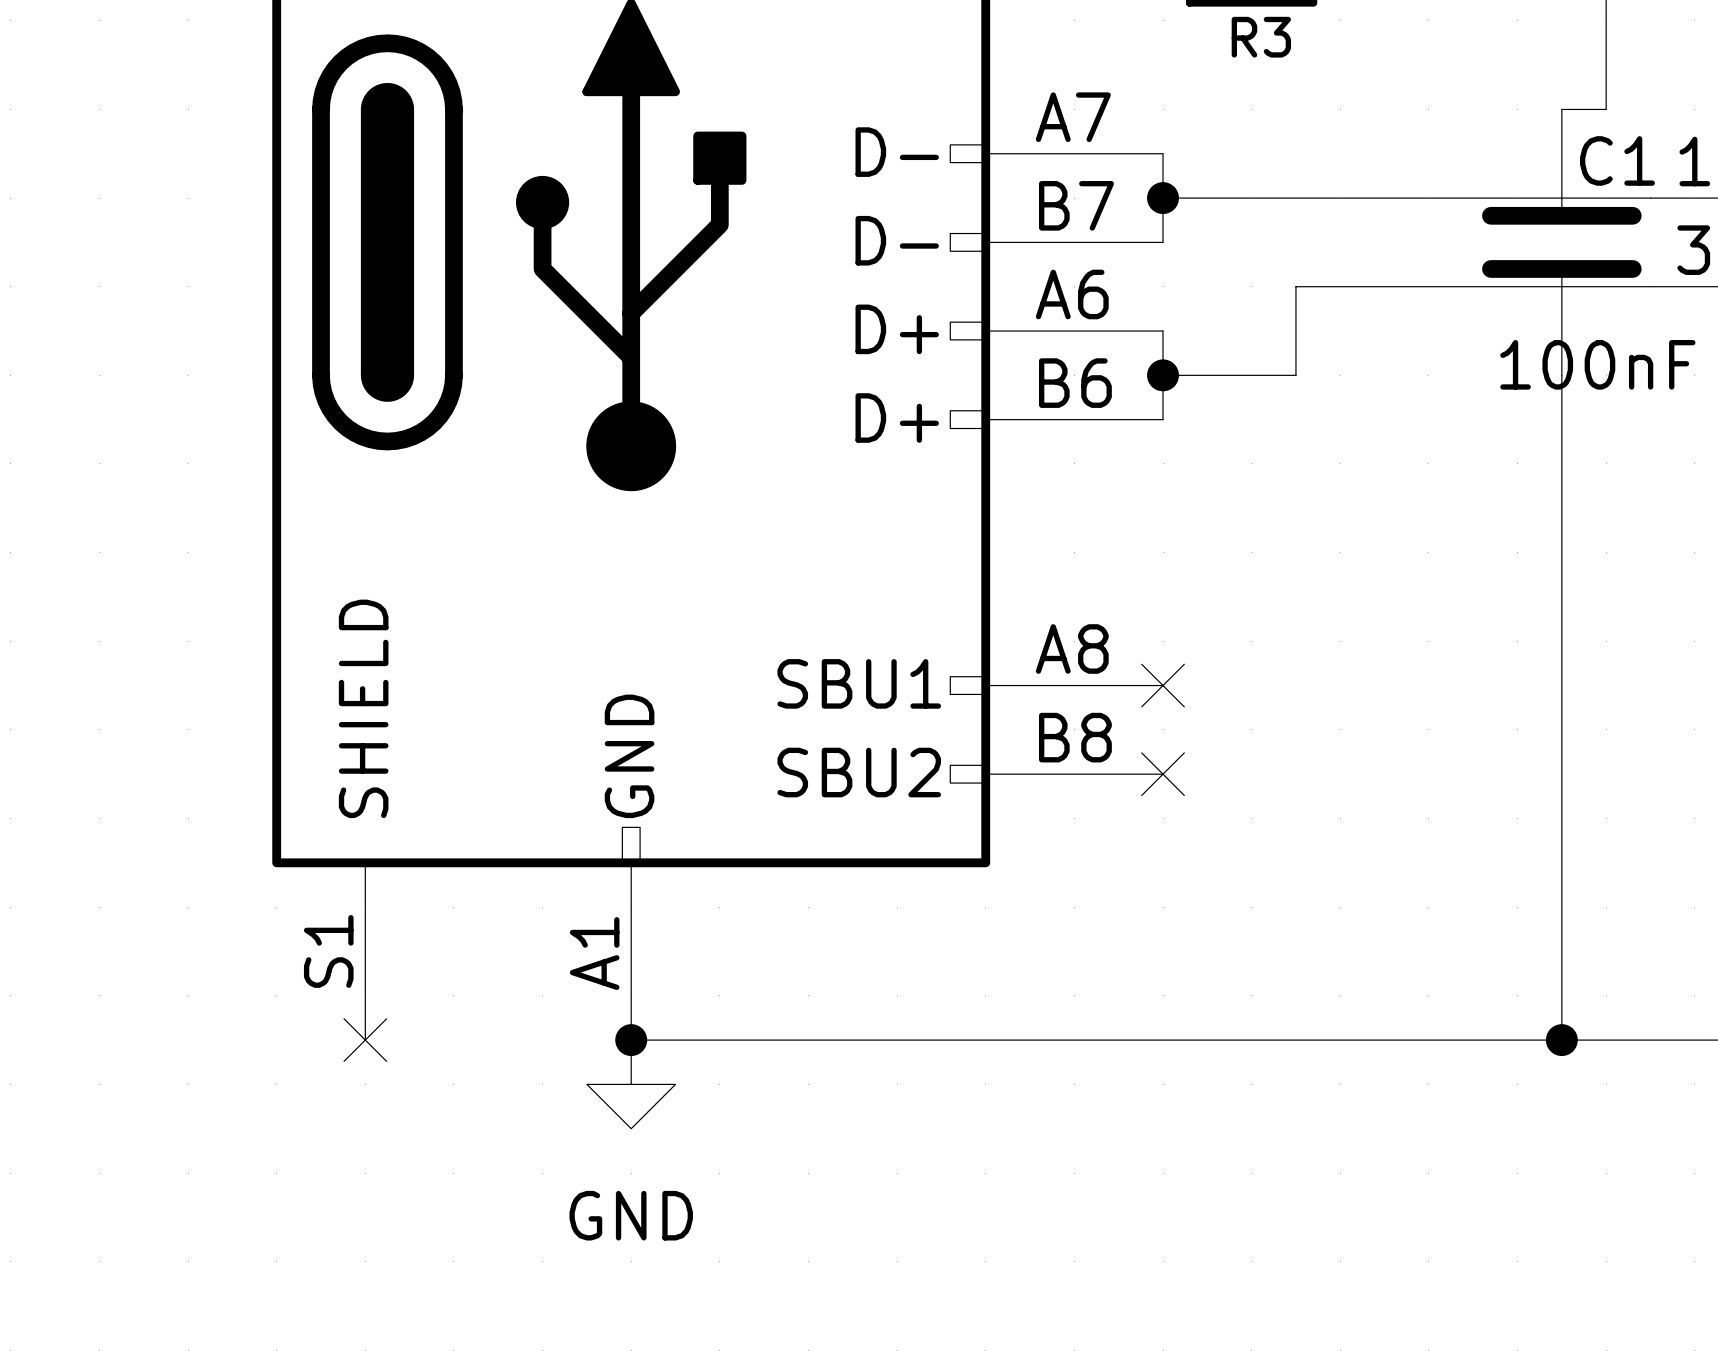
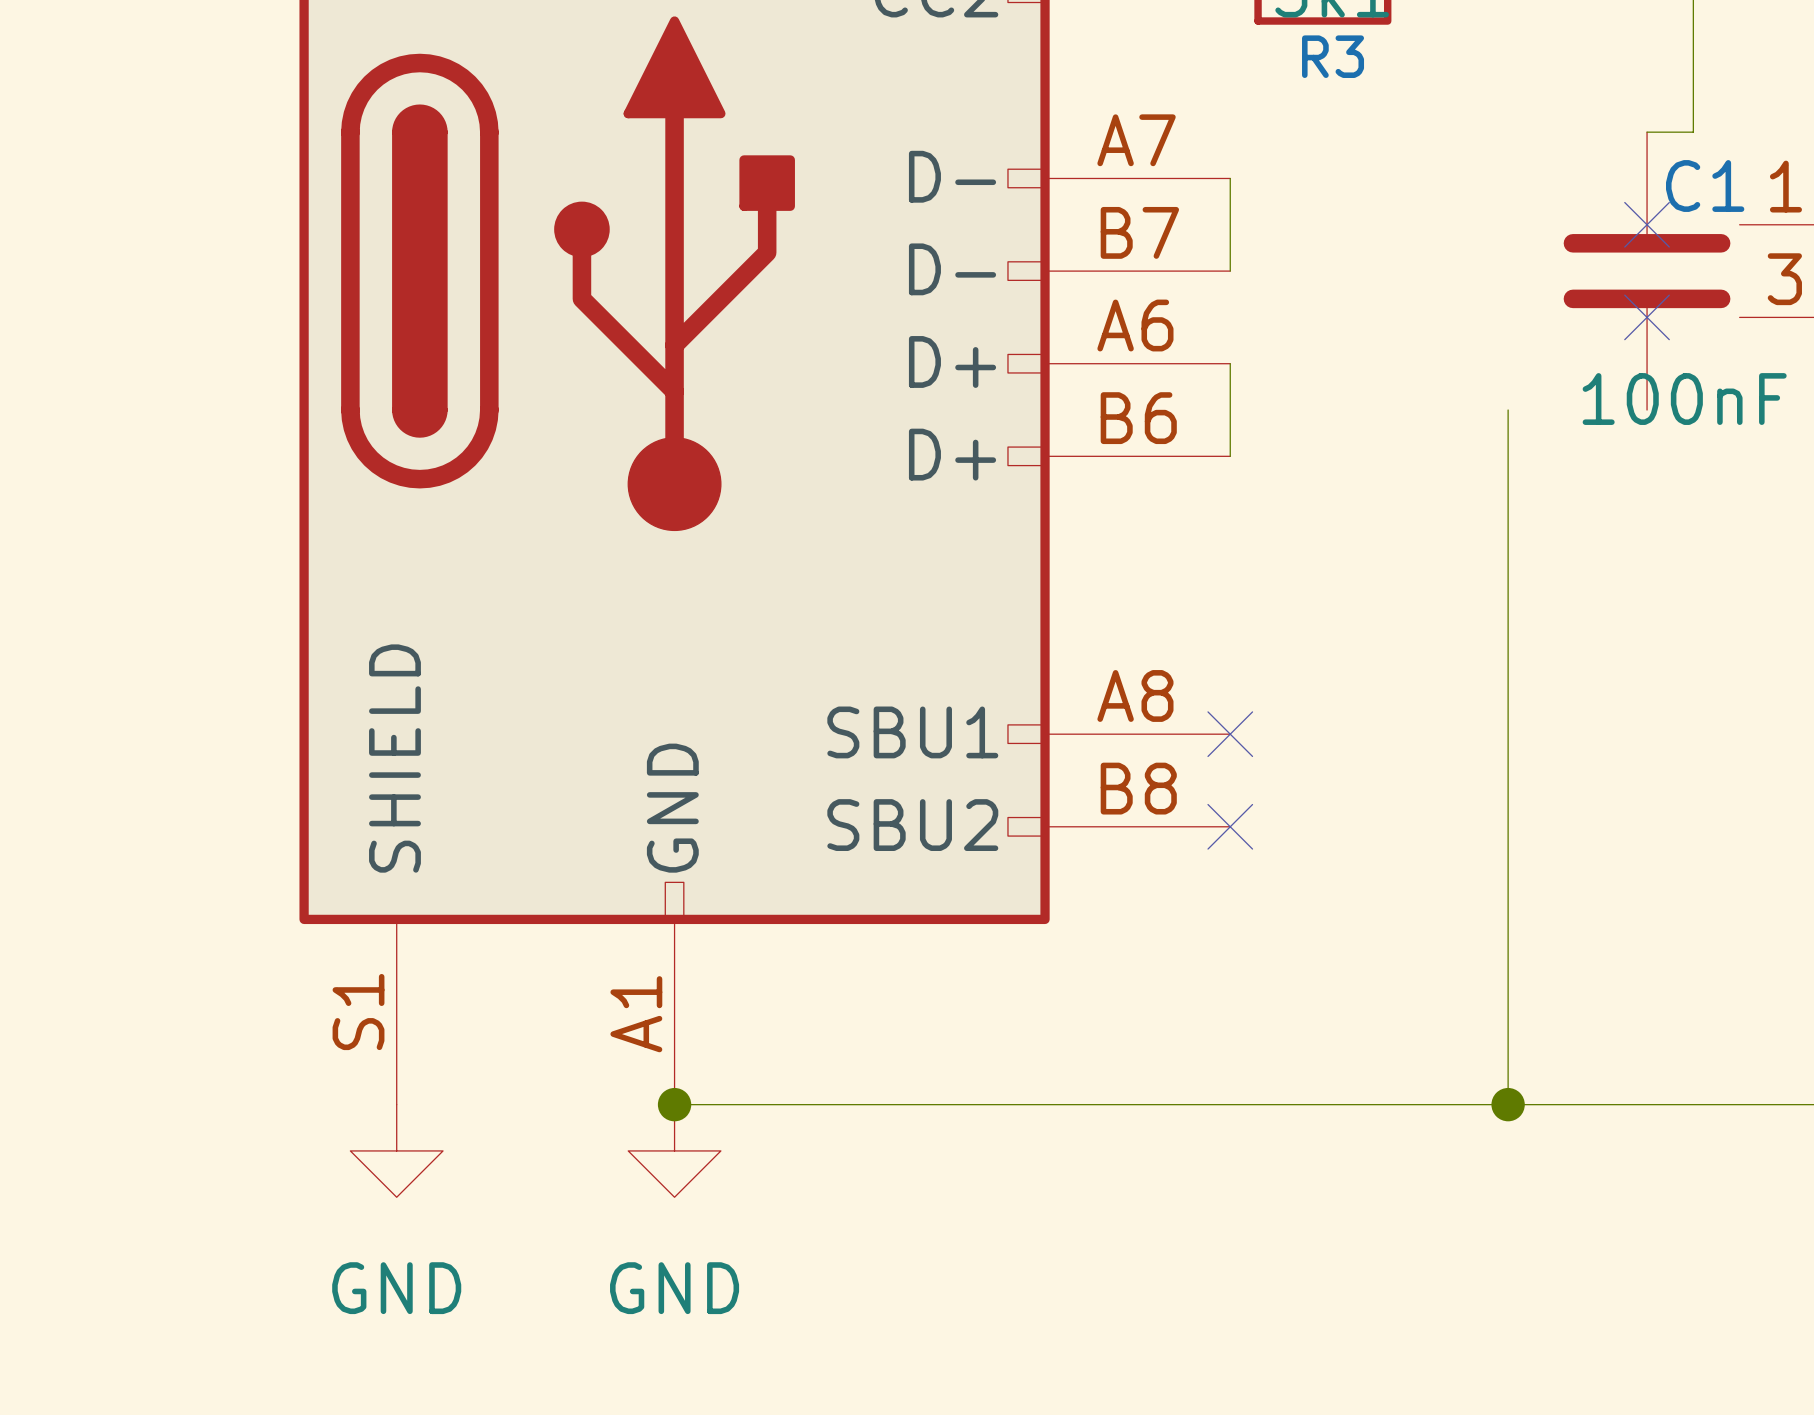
wire: (1163, 198) (1650, 198) -> none
junction: (1163, 198) -> none
no-connect mark: none -> (1647, 224)
no-connect mark: none -> (1647, 317)
wire: (1650, 286) (1295, 286) (1295, 375) (1163, 375) -> none
junction: (1163, 375) -> none
wire: (1561, 375) (1561, 1040) -> (1508, 410) (1508, 1104)
no-connect mark: (365, 1040) -> none
junction position: (1561, 1040) -> (1508, 1104)
power symbol: none -> GND (396, 1150)

